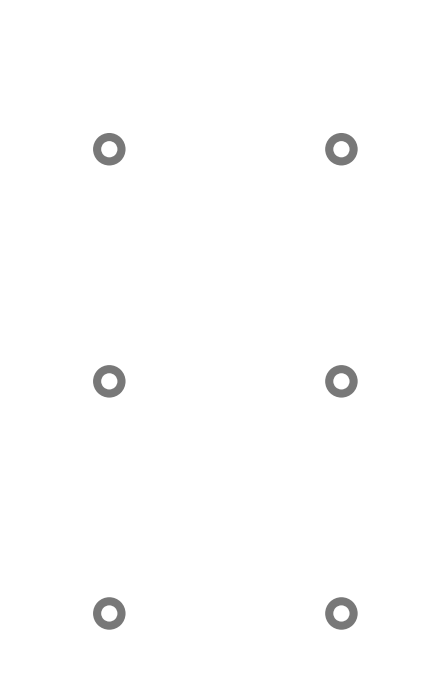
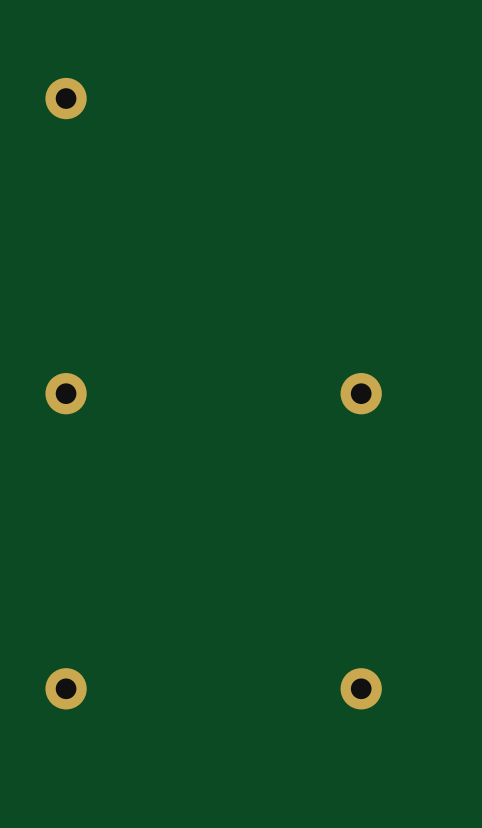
via: (341, 149) -> none

